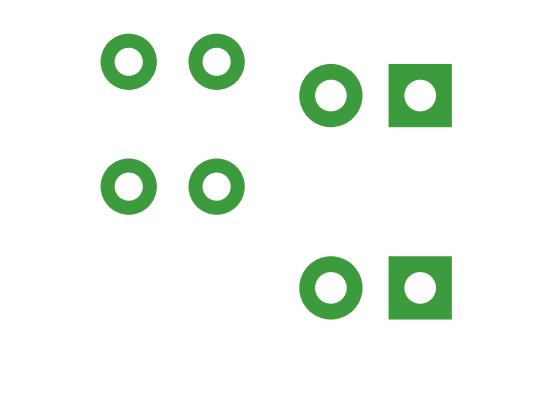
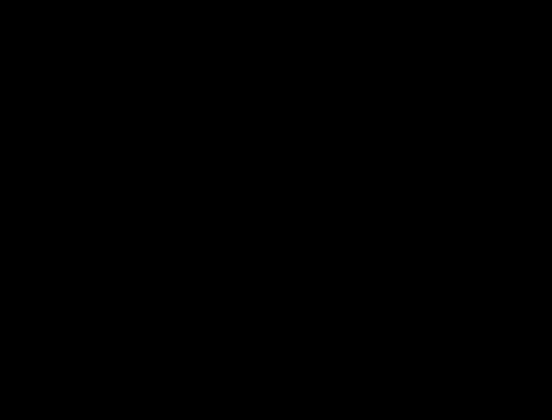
part: (172, 61) -> none
part: (375, 95) -> none
part: (172, 186) -> none
part: (375, 287) -> none

